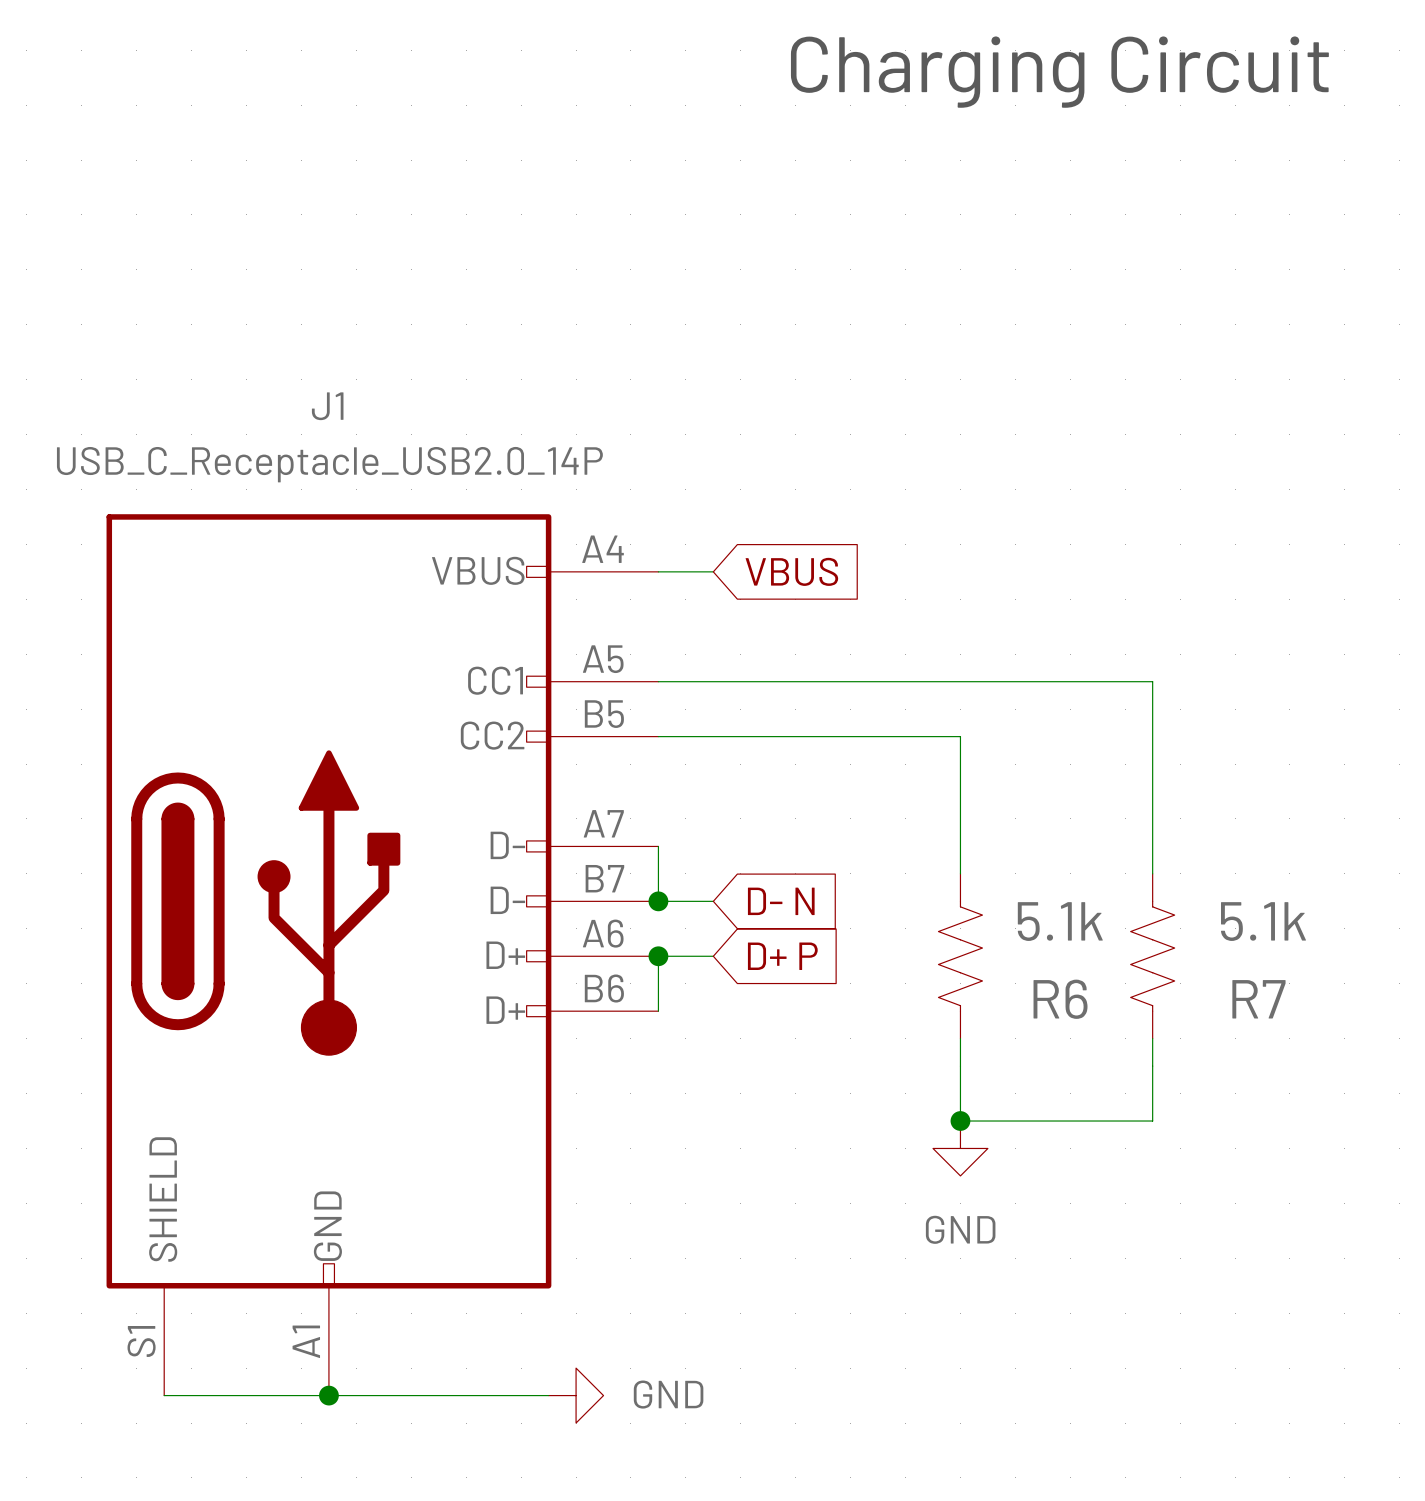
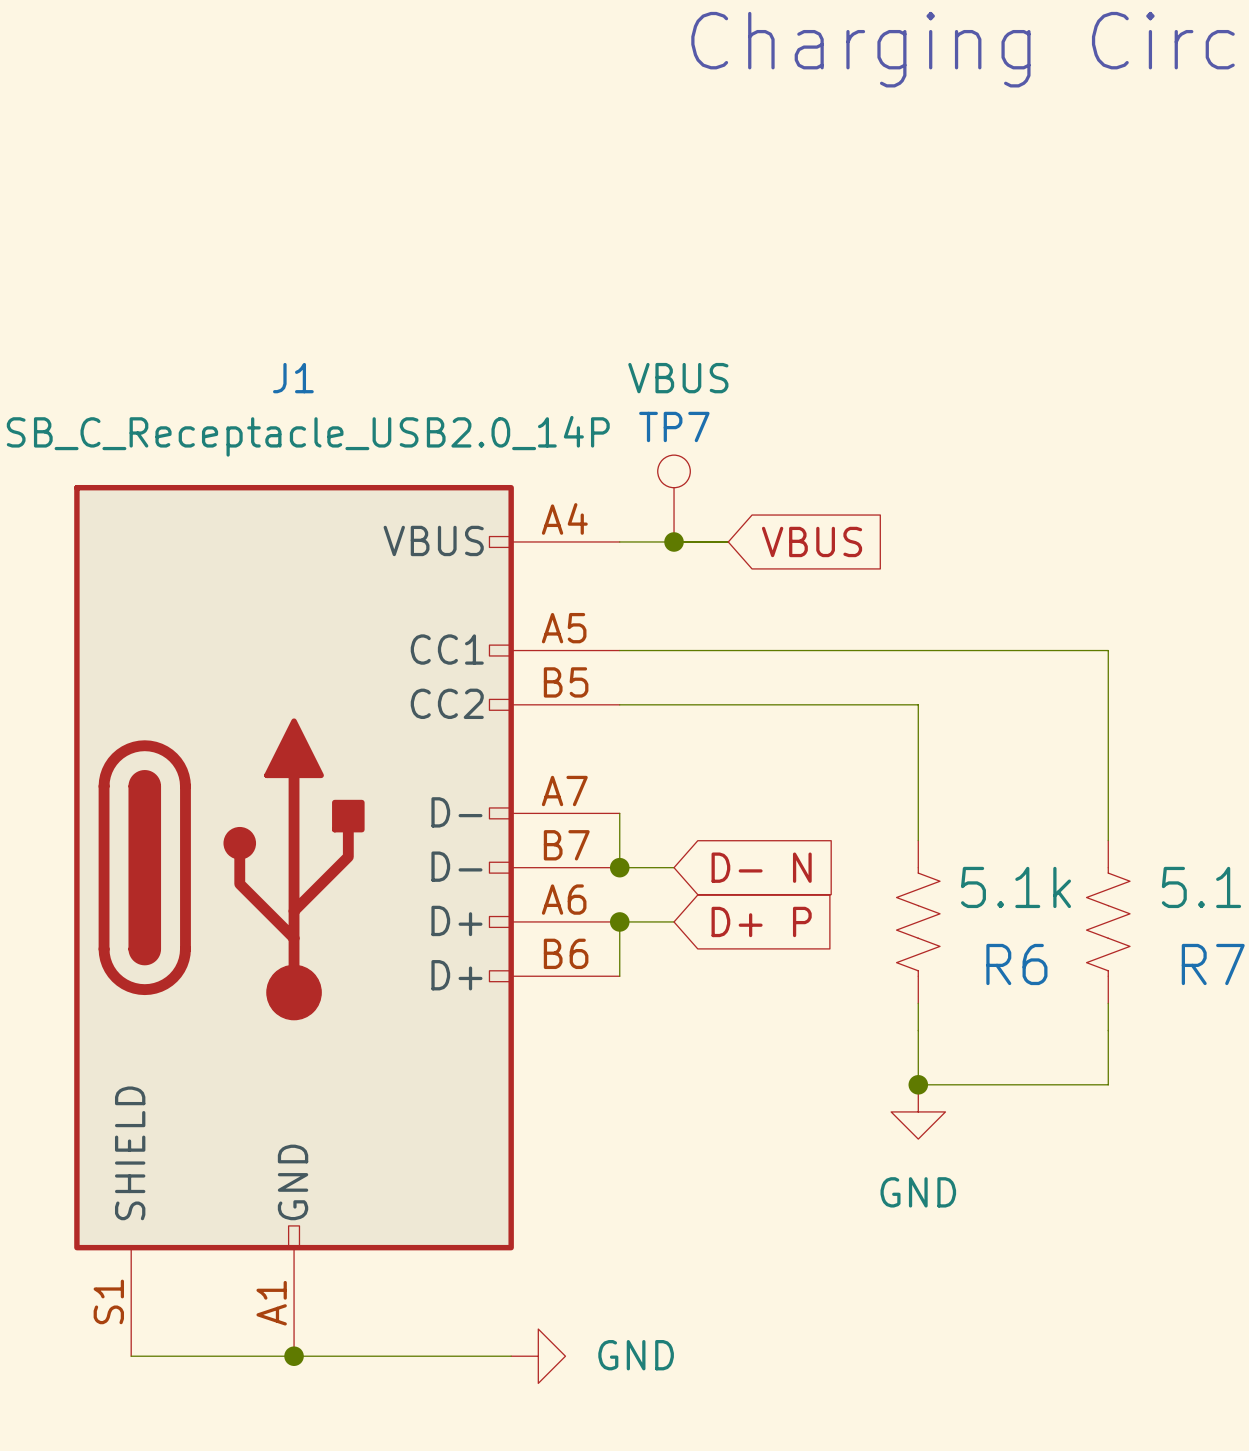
TP7: none -> VBUS (674, 498)
wire: none -> (674, 541) (728, 541)
junction: none -> (674, 541)
global label position: VBUS (791, 571) -> VBUS (812, 541)

